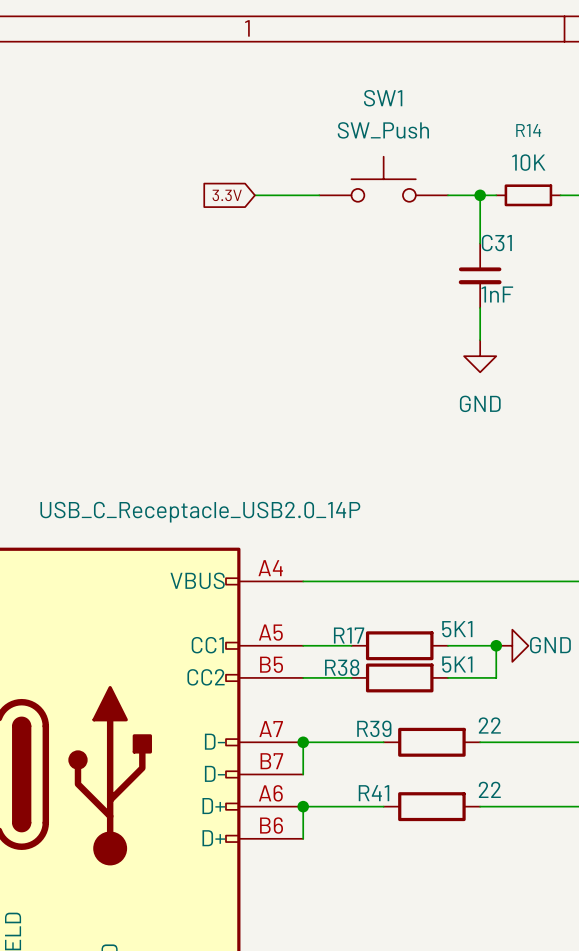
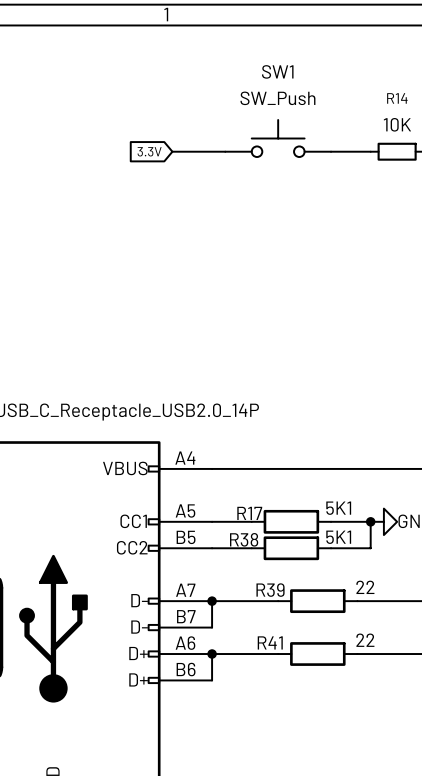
wire: (480, 195) (480, 243) -> none
junction: (480, 195) -> none
C31: 1nF (480, 275) -> none
wire: (480, 307) (480, 340) -> none
power symbol: GND (480, 356) -> none

